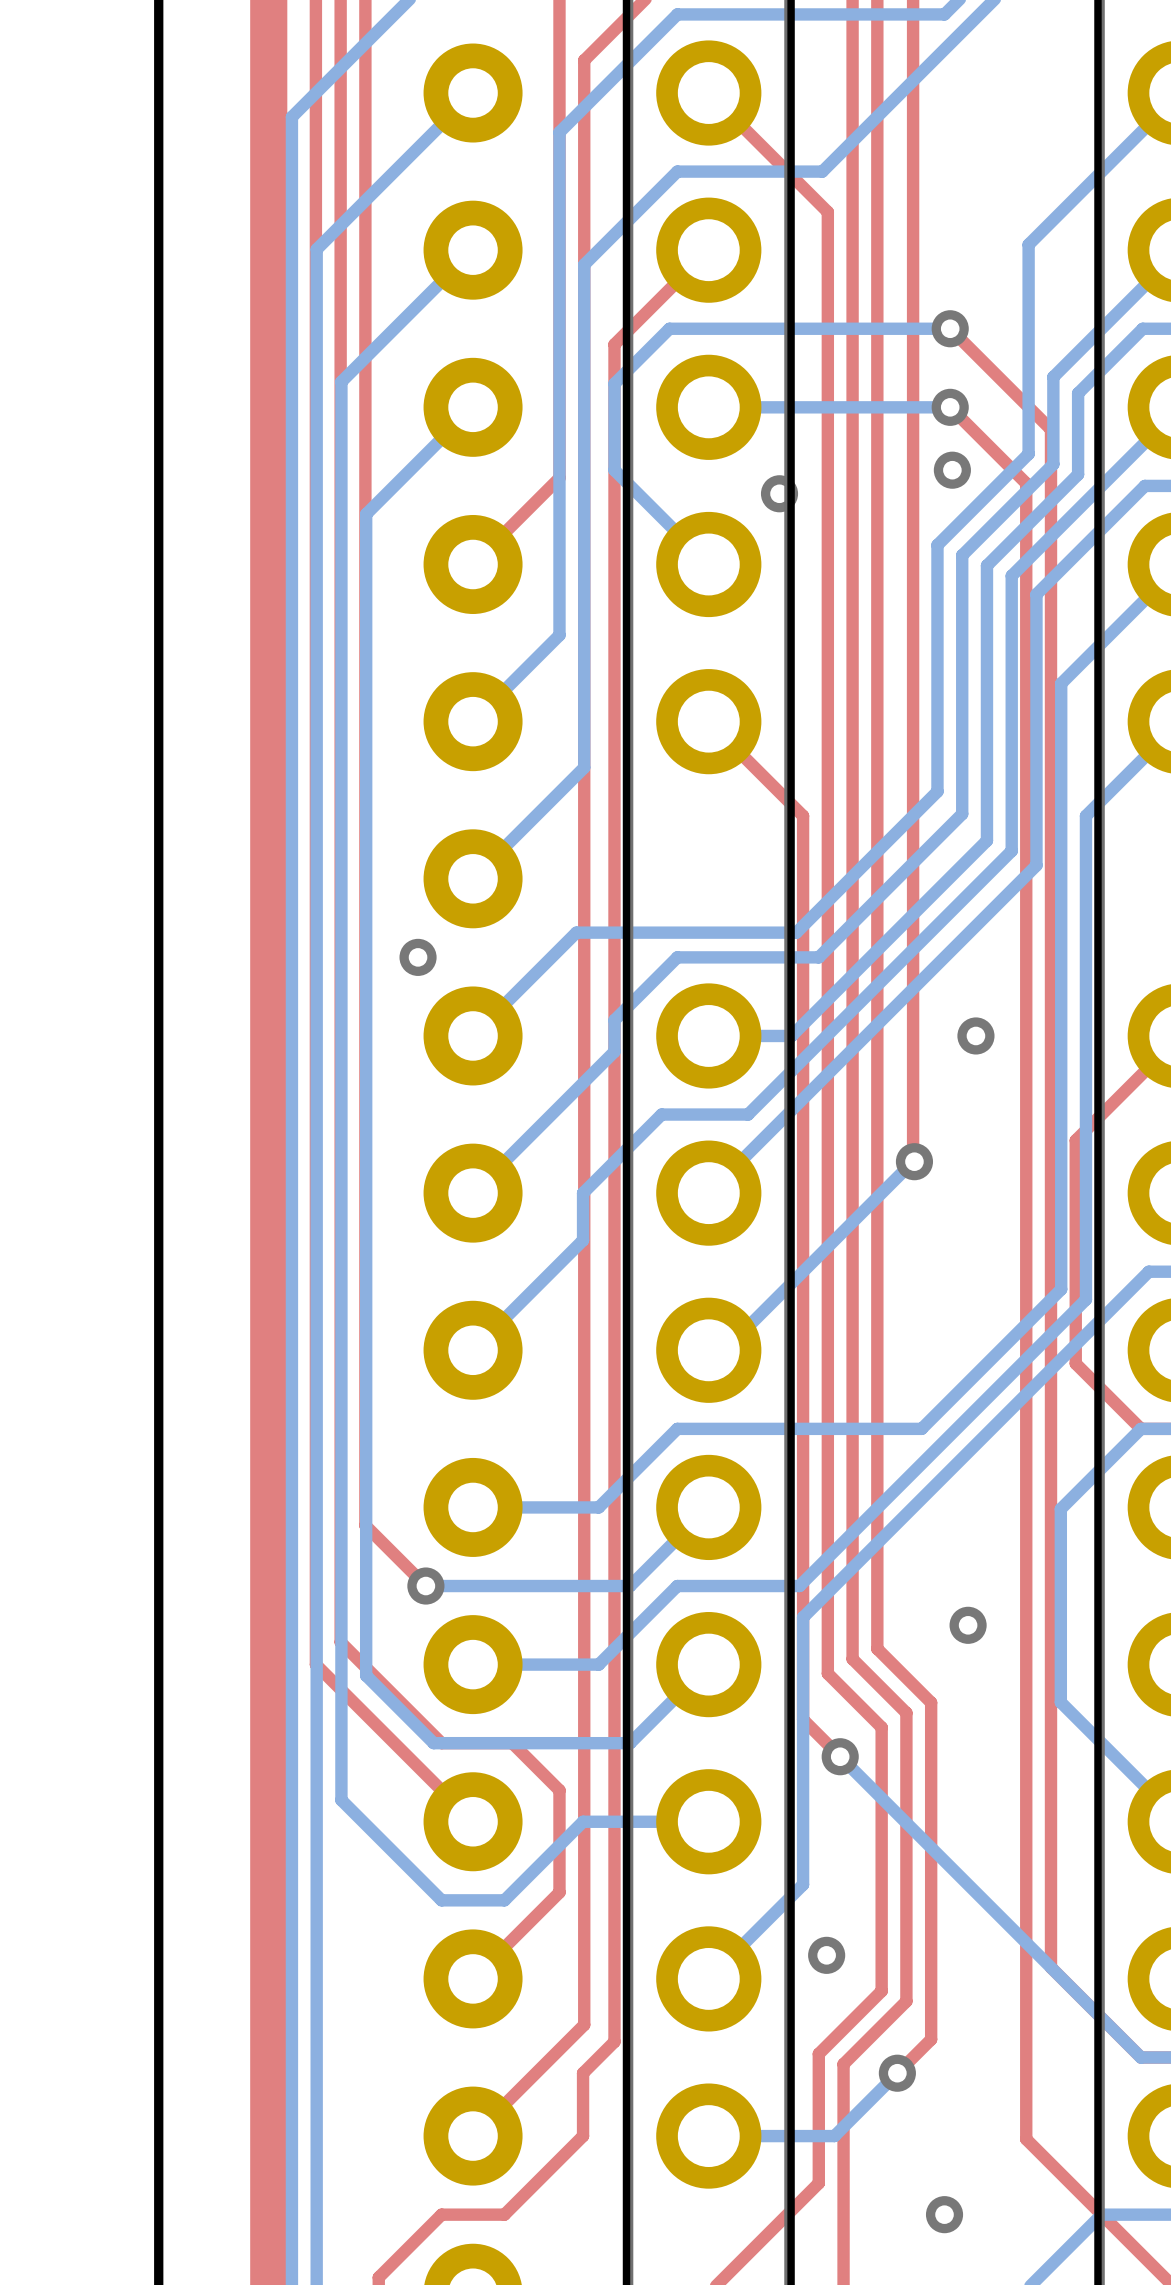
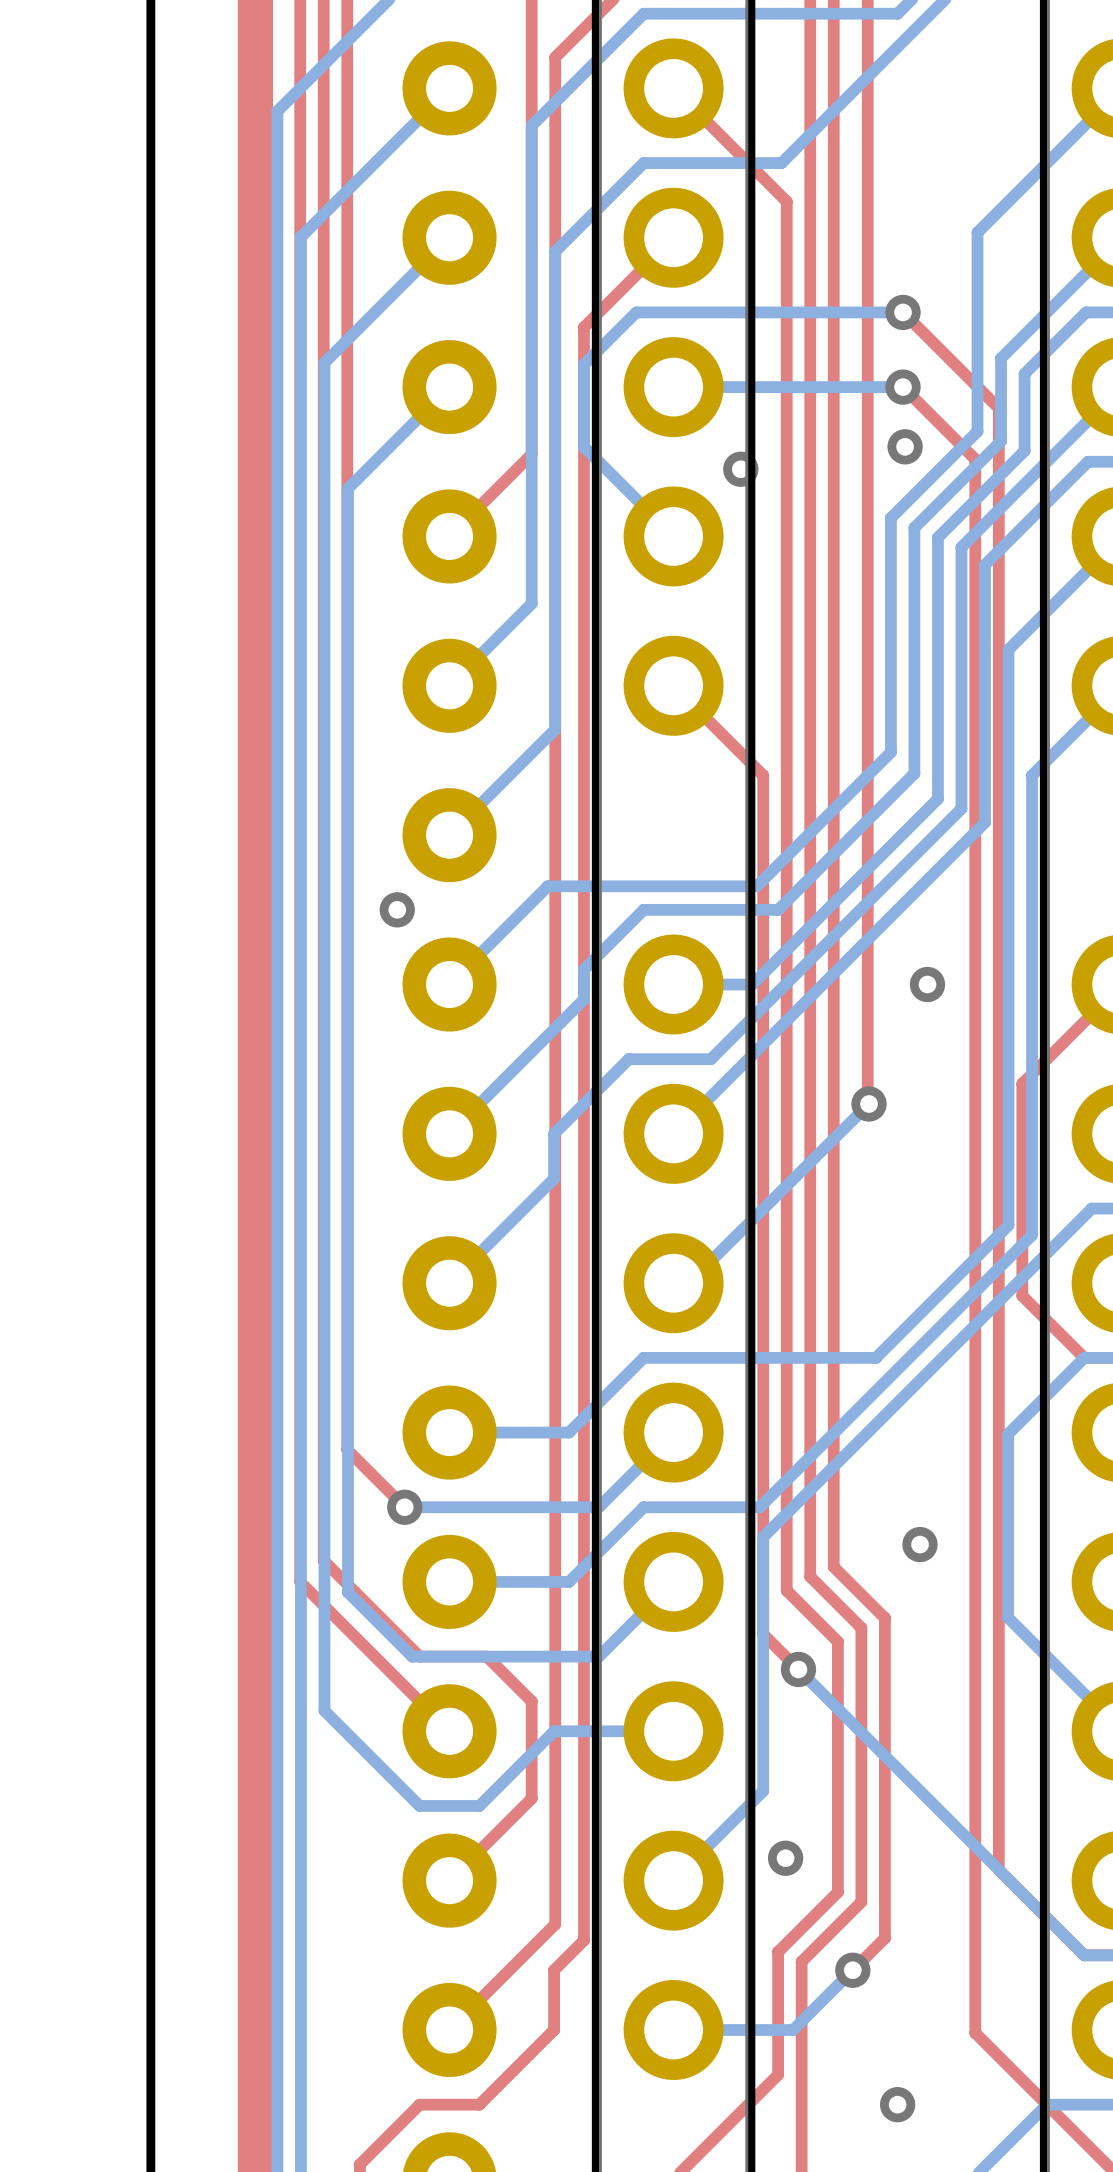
bottom track: (914, 1161) (724, 1350) (708, 1350) -> (869, 1104) (688, 1283)

